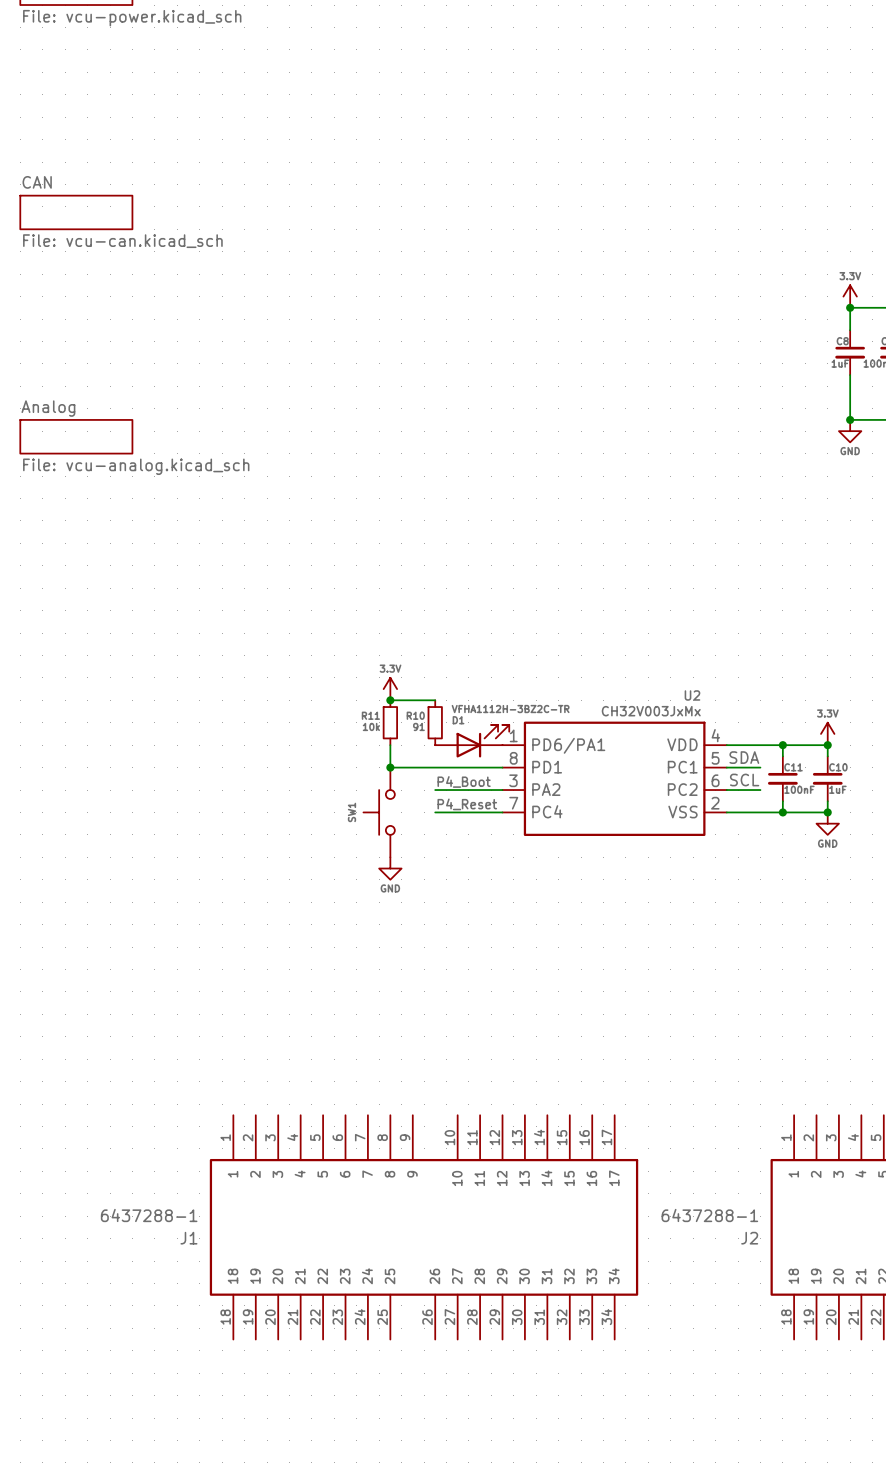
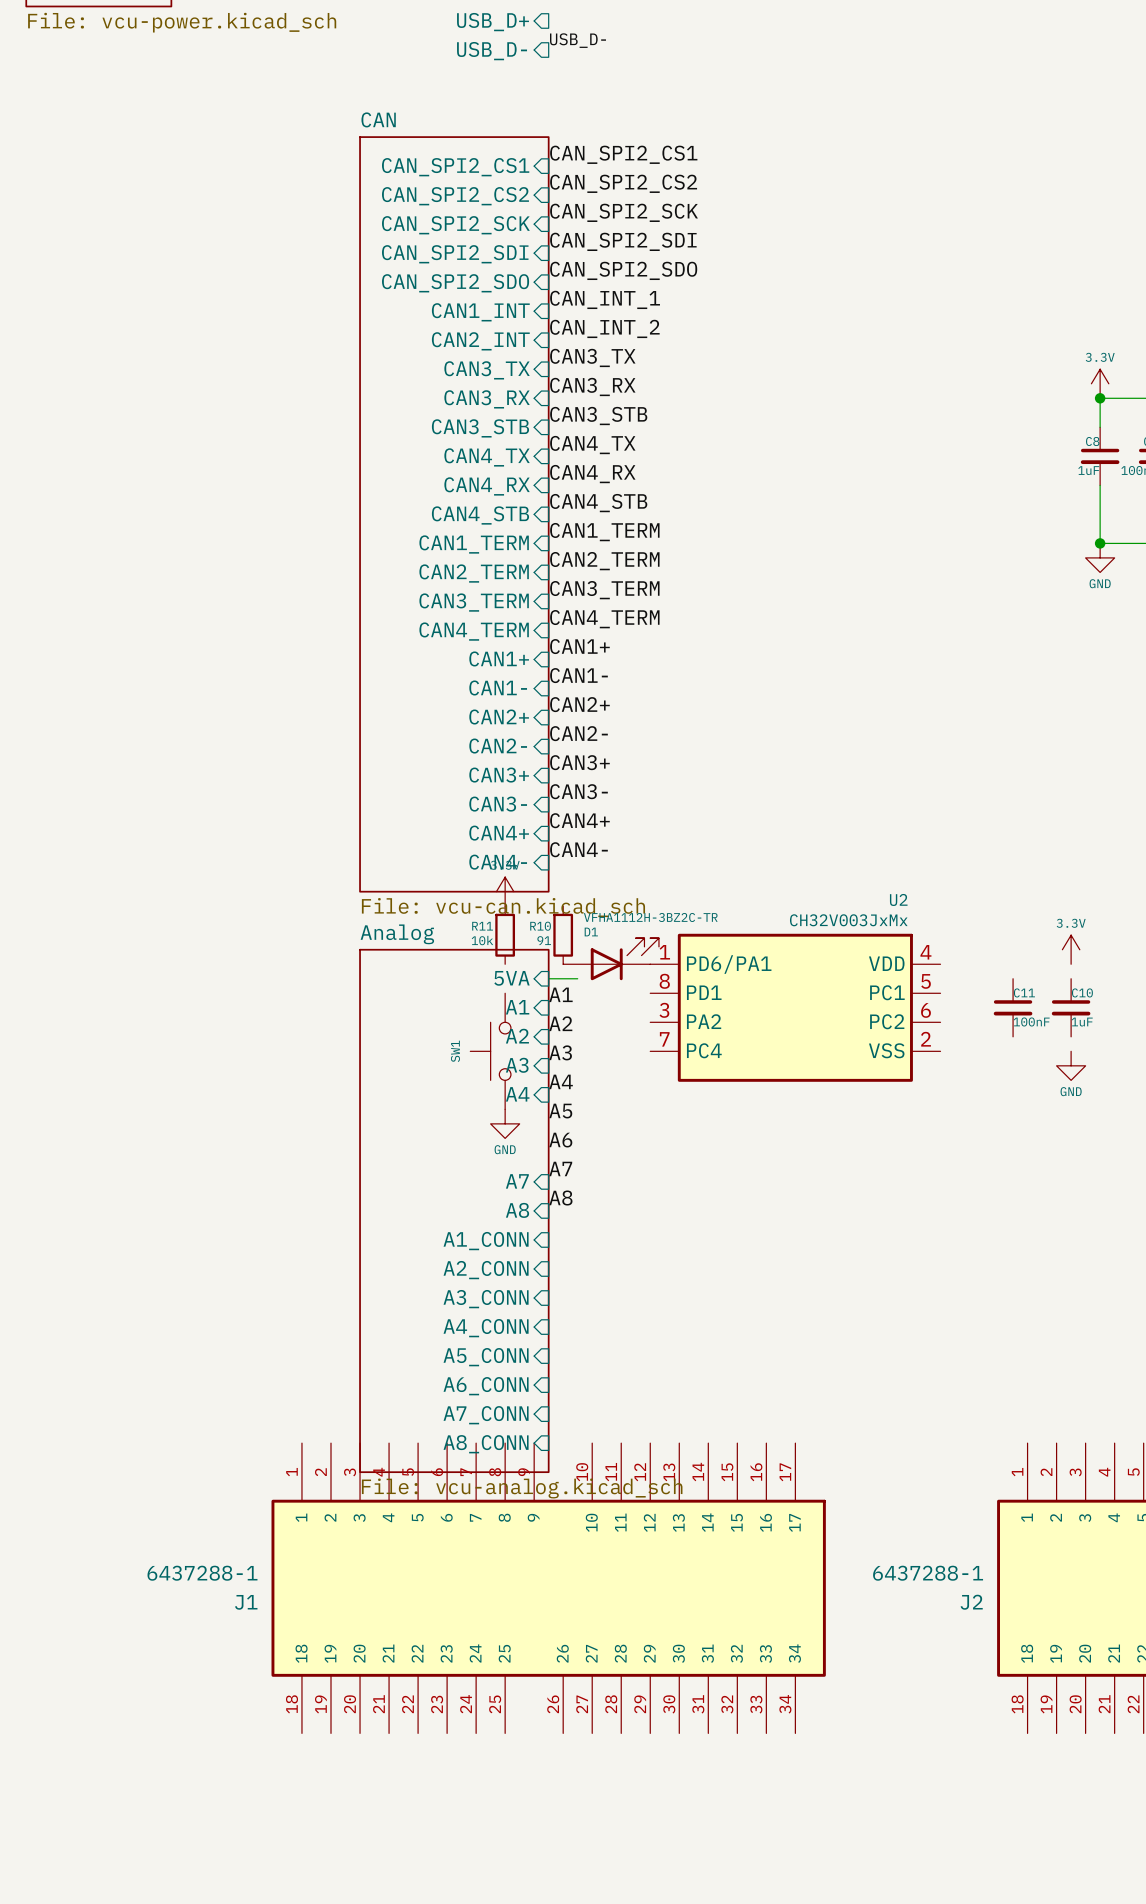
sheet pin: none -> USB_D+ (493, 22)
label: none -> USB_D- (577, 40)
sheet pin: none -> USB_D- (492, 51)
label: none -> CAN_SPI2_CS1 (623, 154)
sheet pin: none -> CAN_SPI2_CS1 (455, 167)
label: none -> CAN_SPI2_CS2 (623, 183)
sheet pin: none -> CAN_SPI2_CS2 (455, 196)
label: none -> CAN_SPI2_SCK (624, 212)
sheet pin: none -> CAN_SPI2_SCK (455, 225)
label: none -> CAN_SPI2_SDI (623, 241)
sheet pin: none -> CAN_SPI2_SDI (455, 254)
label: none -> CAN_SPI2_SDO (623, 270)
sheet CAN: File: vcu-can.kicad_sch (76, 212) -> none
sheet pin: none -> CAN_SPI2_SDO (455, 283)
label: none -> CAN_INT_1 (605, 299)
sheet pin: none -> CAN1_INT (480, 312)
label: none -> CAN_INT_2 (604, 328)
sheet pin: none -> CAN2_INT (480, 341)
label: none -> CAN3_TX (592, 357)
sheet pin: none -> CAN3_TX (487, 370)
label: none -> CAN3_RX (592, 386)
sheet pin: none -> CAN3_RX (487, 399)
label: none -> CAN3_STB (598, 416)
sheet pin: none -> CAN3_STB (480, 428)
label: none -> CAN4_TX (592, 445)
sheet pin: none -> CAN4_TX (487, 457)
label: none -> CAN4_RX (592, 474)
sheet pin: none -> CAN4_RX (487, 486)
label: none -> CAN4_STB (598, 503)
sheet CAN: none -> File: vcu-can.kicad_sch (454, 514)
sheet pin: none -> CAN4_STB (480, 515)
label: none -> CAN1_TERM (604, 532)
sheet pin: none -> CAN1_TERM (474, 544)
label: none -> CAN2_TERM (604, 561)
sheet Analog: File: vcu-analog.kicad_sch (76, 436) -> none
sheet pin: none -> CAN2_TERM (474, 573)
label: none -> CAN3_TERM (604, 590)
sheet pin: none -> CAN3_TERM (474, 602)
label: none -> CAN4_TERM (604, 619)
sheet pin: none -> CAN4_TERM (474, 631)
label: none -> CAN1+ (579, 646)
sheet pin: none -> CAN1+ (499, 658)
label: none -> CAN1- (578, 675)
sheet pin: none -> CAN1- (498, 687)
label: none -> CAN2+ (579, 704)
sheet pin: none -> CAN2+ (499, 717)
label: none -> CAN2- (578, 733)
sheet pin: none -> CAN2- (498, 746)
label: none -> CAN3+ (579, 762)
sheet pin: none -> CAN3+ (499, 775)
label: none -> CAN3- (578, 791)
sheet pin: none -> CAN3- (498, 804)
label: none -> CAN4+ (579, 820)
sheet pin: none -> CAN4+ (499, 833)
label: none -> CAN4- (578, 849)
sheet pin: none -> CAN4- (498, 862)
wire: (390, 700) (435, 700) -> none
junction: (390, 700) -> none
wire: (390, 745) (390, 767) (502, 767) -> none
wire: (726, 745) (827, 745) (827, 756) -> none
wire: (782, 745) (782, 756) -> none
junction: (782, 745) -> none
junction: (827, 745) -> none
sheet pin: none -> 5VA (511, 978)
wire: none -> (548, 978) (577, 978)
label: SDA (744, 757) -> none
junction: (390, 767) -> none
wire: (726, 767) (760, 767) -> none
label: none -> A1 (560, 994)
sheet pin: none -> A1 (517, 1007)
label: SCL (744, 780) -> none
label: P4_Boot (464, 781) -> none
wire: (435, 790) (502, 790) -> none
wire: (726, 790) (760, 790) -> none
label: none -> A2 (560, 1023)
sheet pin: none -> A2 (517, 1036)
wire: (782, 801) (782, 812) -> none
wire: (827, 801) (827, 812) (726, 812) -> none
label: P4_Reset (467, 804) -> none
wire: (435, 812) (502, 812) -> none
junction: (782, 812) -> none
junction: (827, 812) -> none
label: none -> A3 (560, 1052)
sheet pin: none -> A3 (517, 1065)
label: none -> A4 (561, 1081)
sheet pin: none -> A4 (517, 1094)
label: none -> A5 (560, 1111)
label: none -> A6 (560, 1140)
label: none -> A7 (560, 1168)
sheet pin: none -> A7 (517, 1181)
label: none -> A8 (560, 1198)
sheet Analog: none -> File: vcu-analog.kicad_sch (454, 1210)
sheet pin: none -> A8 (517, 1210)
sheet pin: none -> A1_CONN (486, 1241)
sheet pin: none -> A2_CONN (486, 1270)
sheet pin: none -> A3_CONN (486, 1299)
sheet pin: none -> A4_CONN (486, 1328)
sheet pin: none -> A5_CONN (486, 1357)
sheet pin: none -> A6_CONN (486, 1386)
sheet pin: none -> A7_CONN (486, 1415)
sheet pin: none -> A8_CONN (486, 1444)

